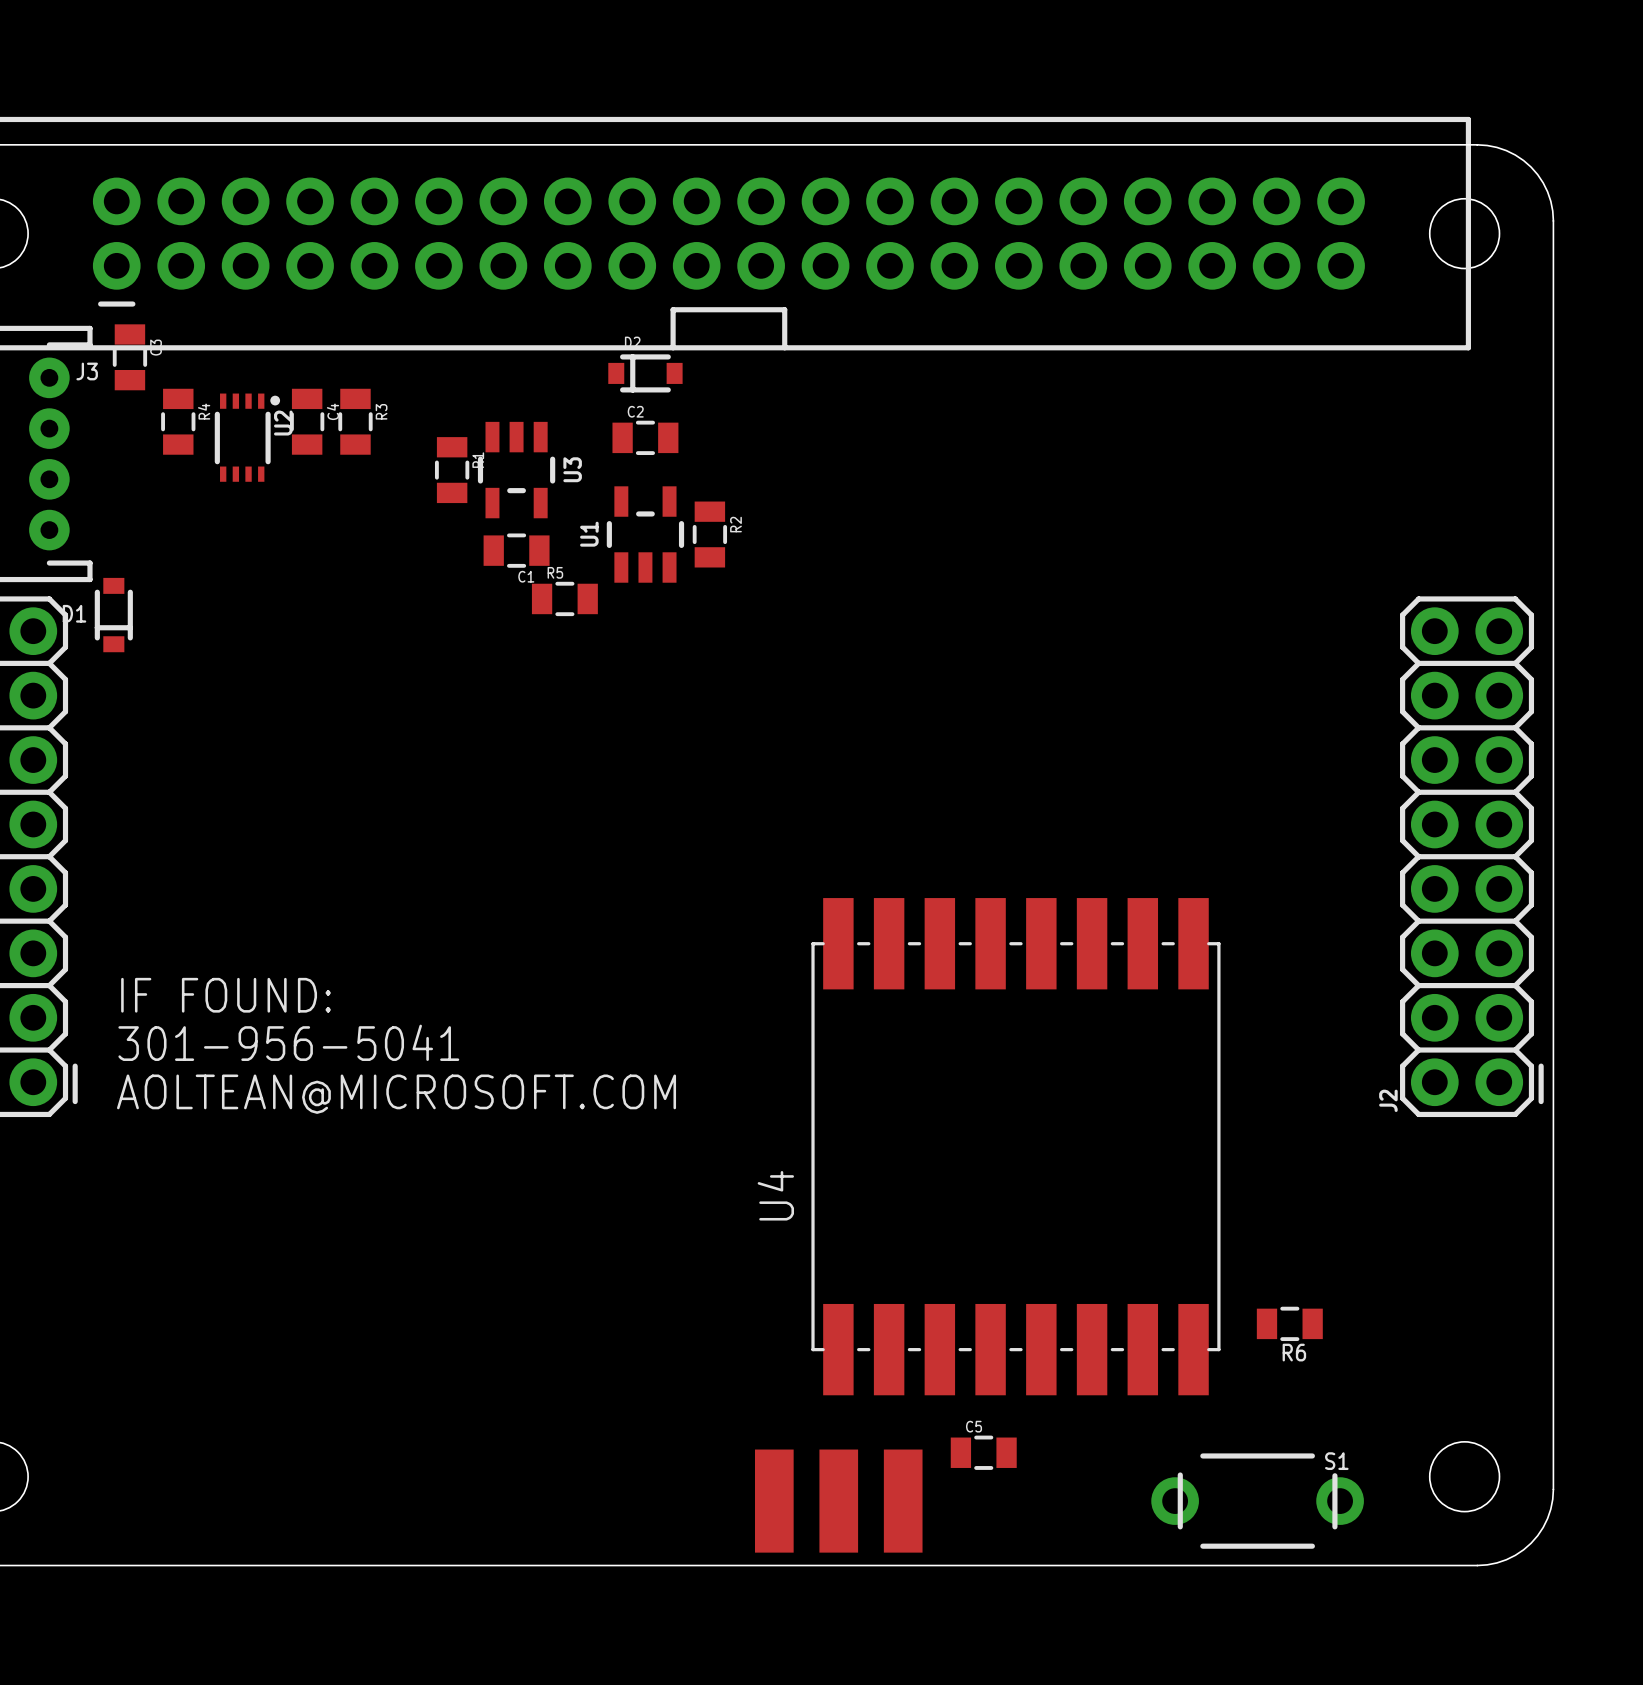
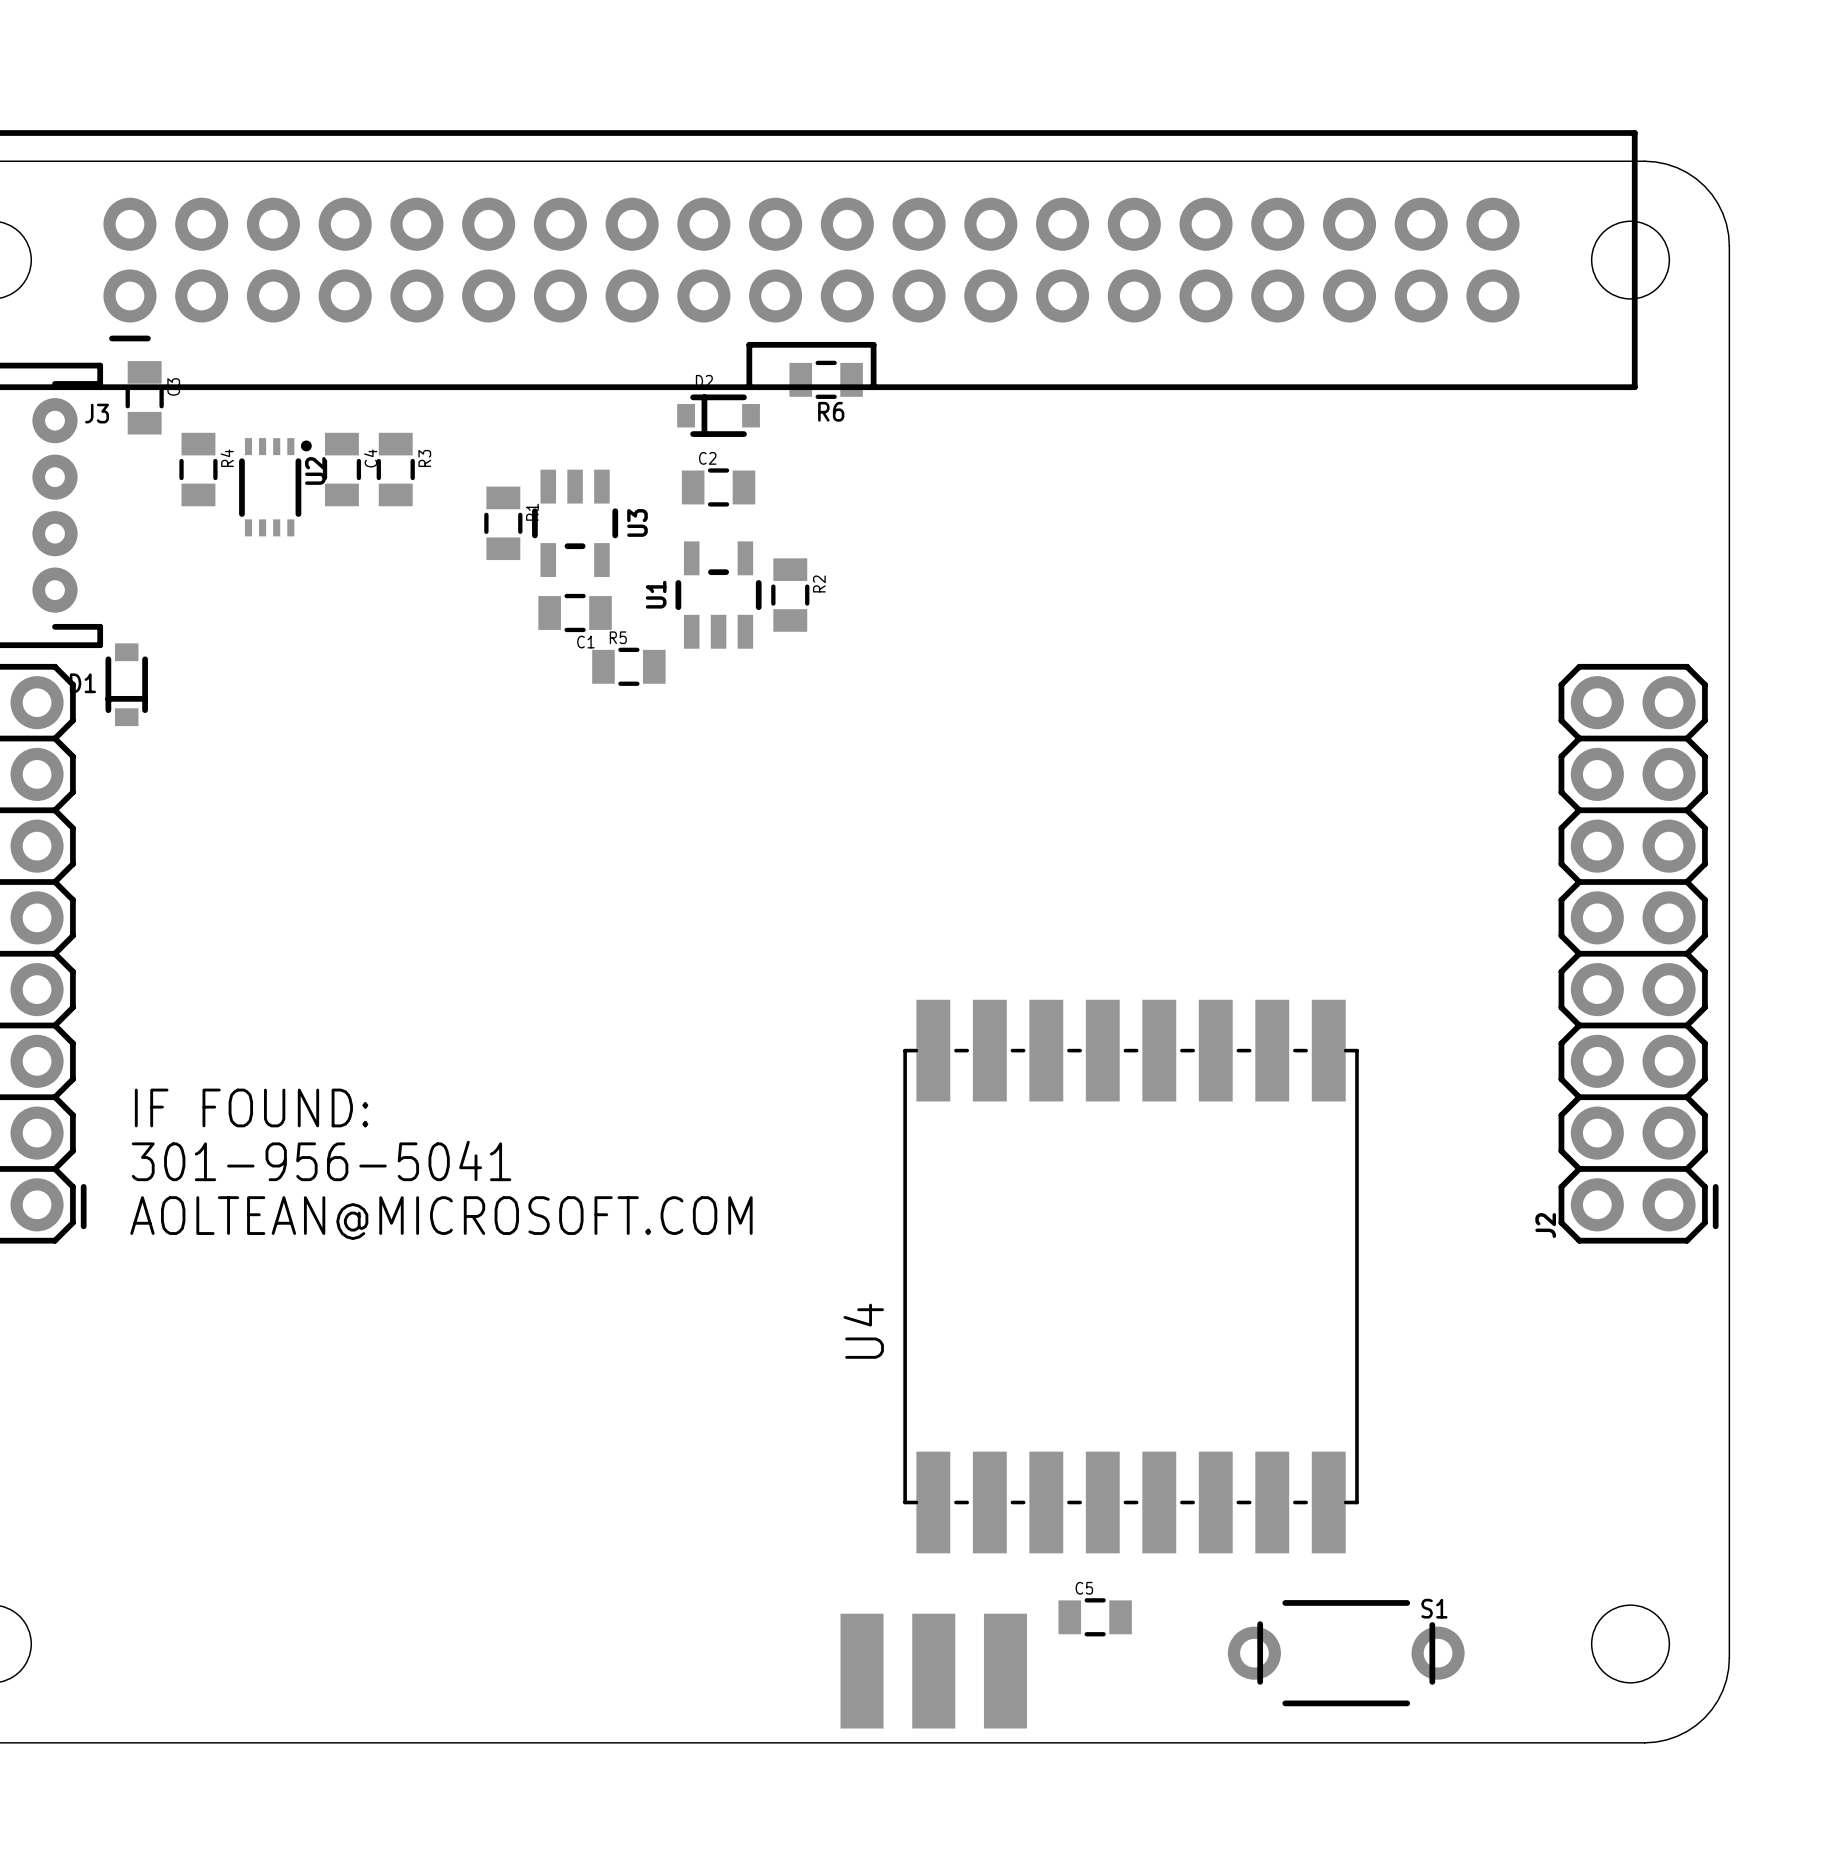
R6 position: (1289, 1323) -> (826, 379)
S1 position: (1257, 1501) -> (1346, 1653)

